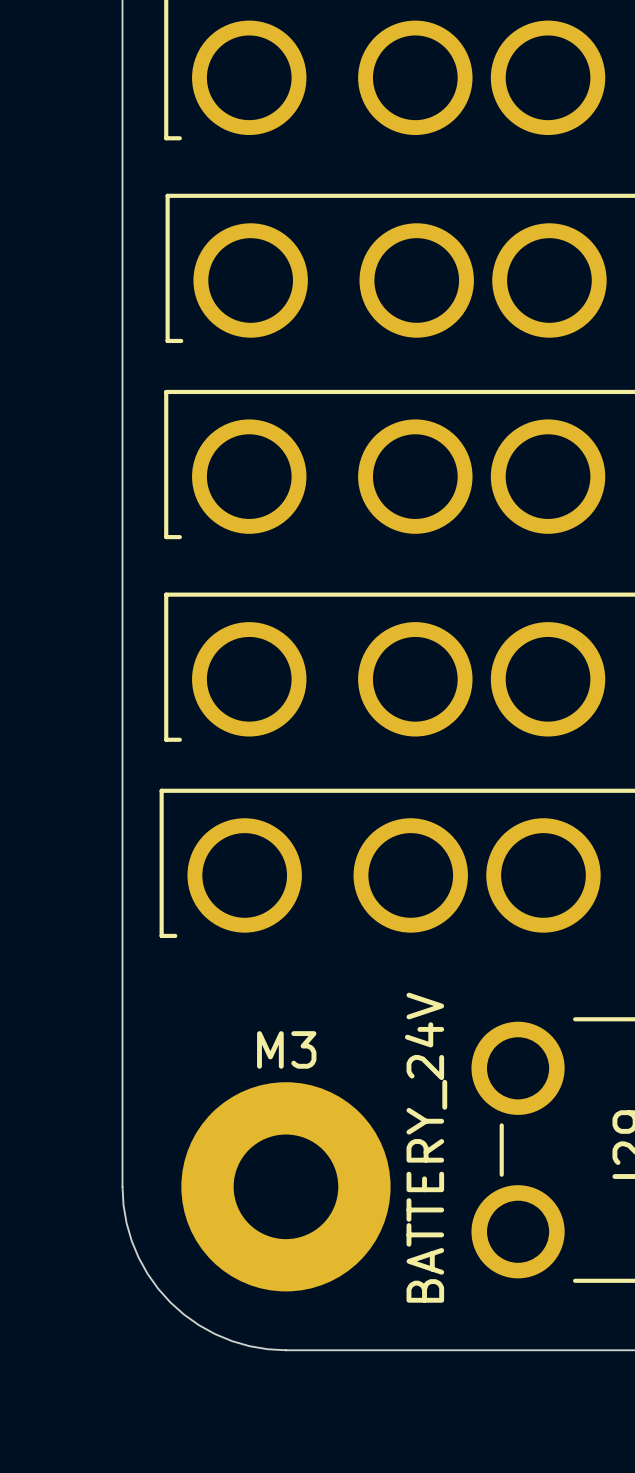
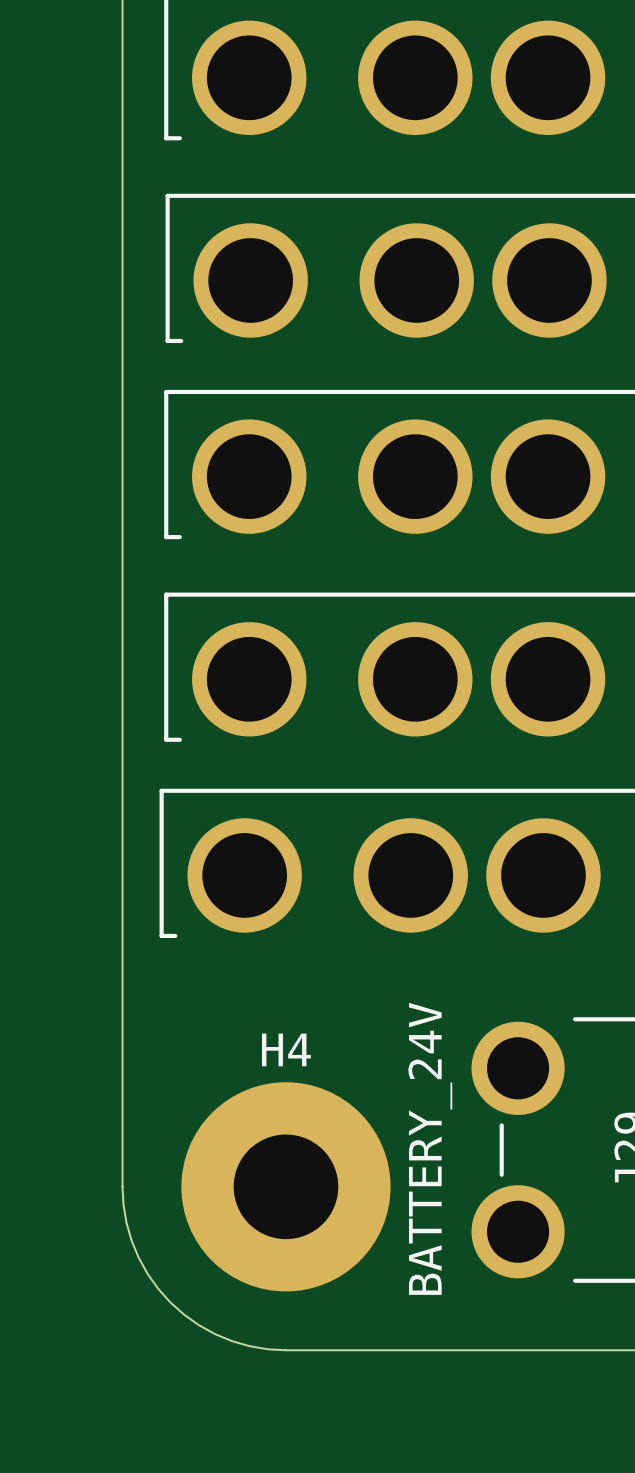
M3 name: M3 (286, 1049) -> H4 (286, 1049)

